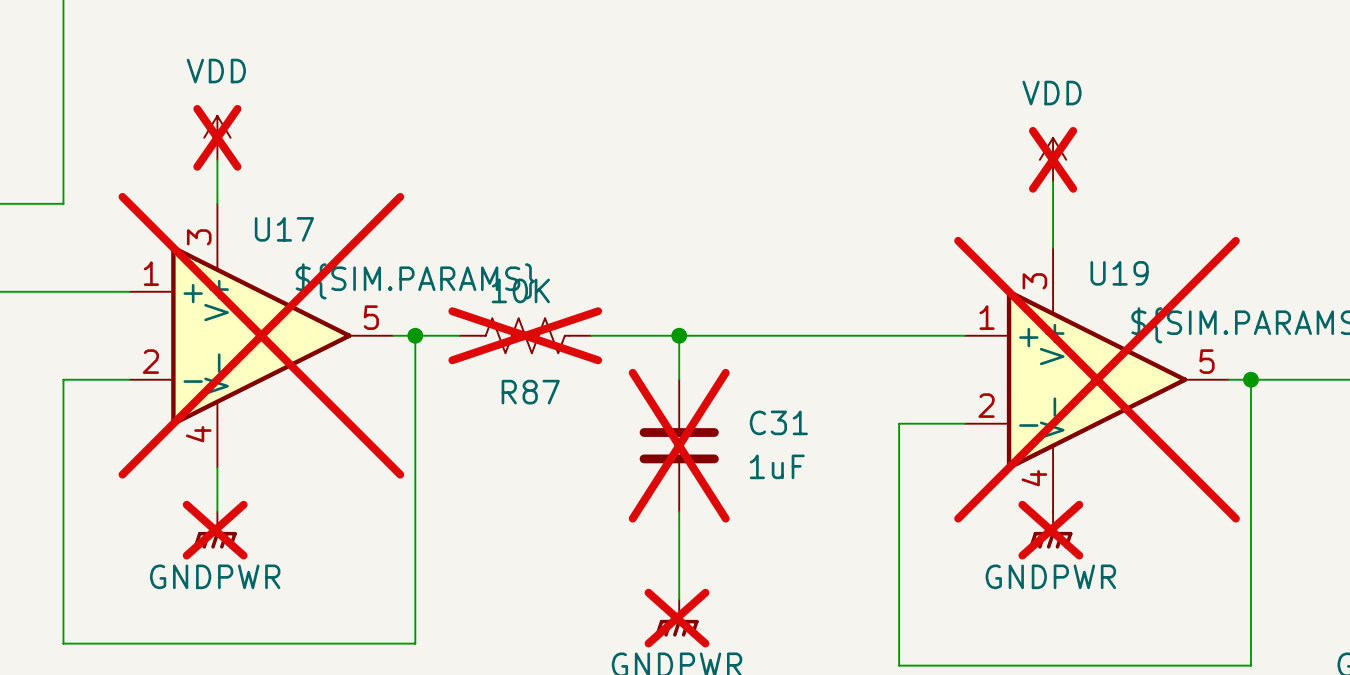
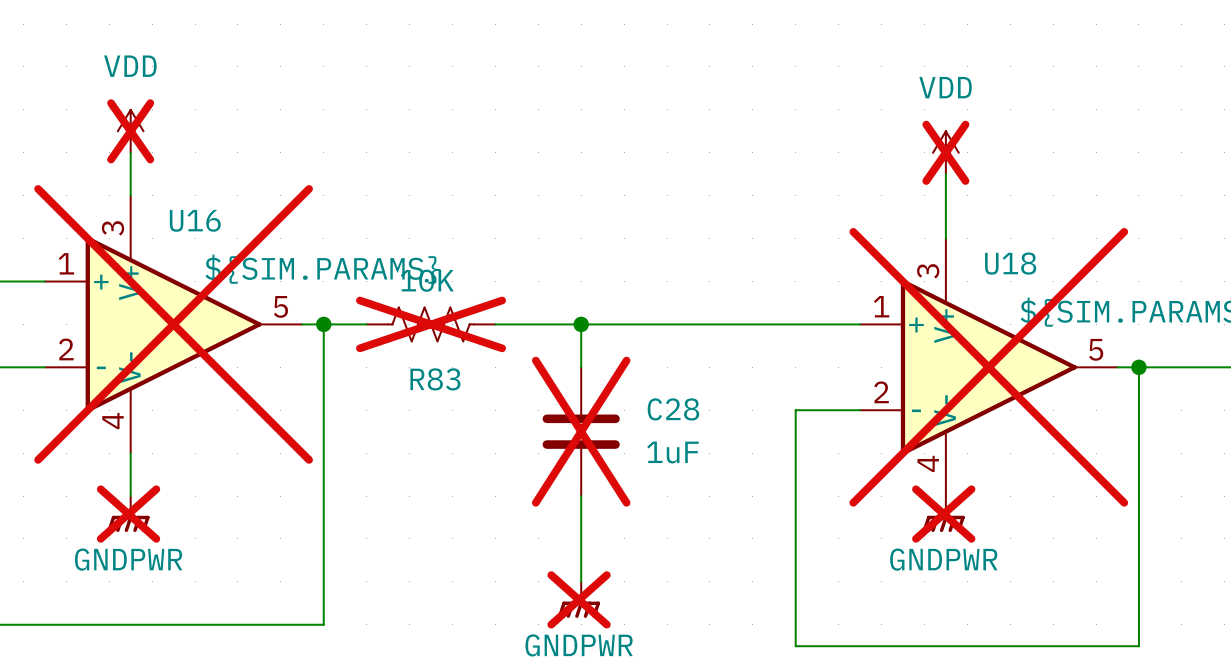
U17 name: U17 (284, 229) -> U16 (195, 220)
U19 name: U19 (1119, 273) -> U18 (1010, 263)
R87 name: R87 (530, 392) -> R83 (435, 379)
C31 name: C31 (778, 422) -> C28 (673, 409)

